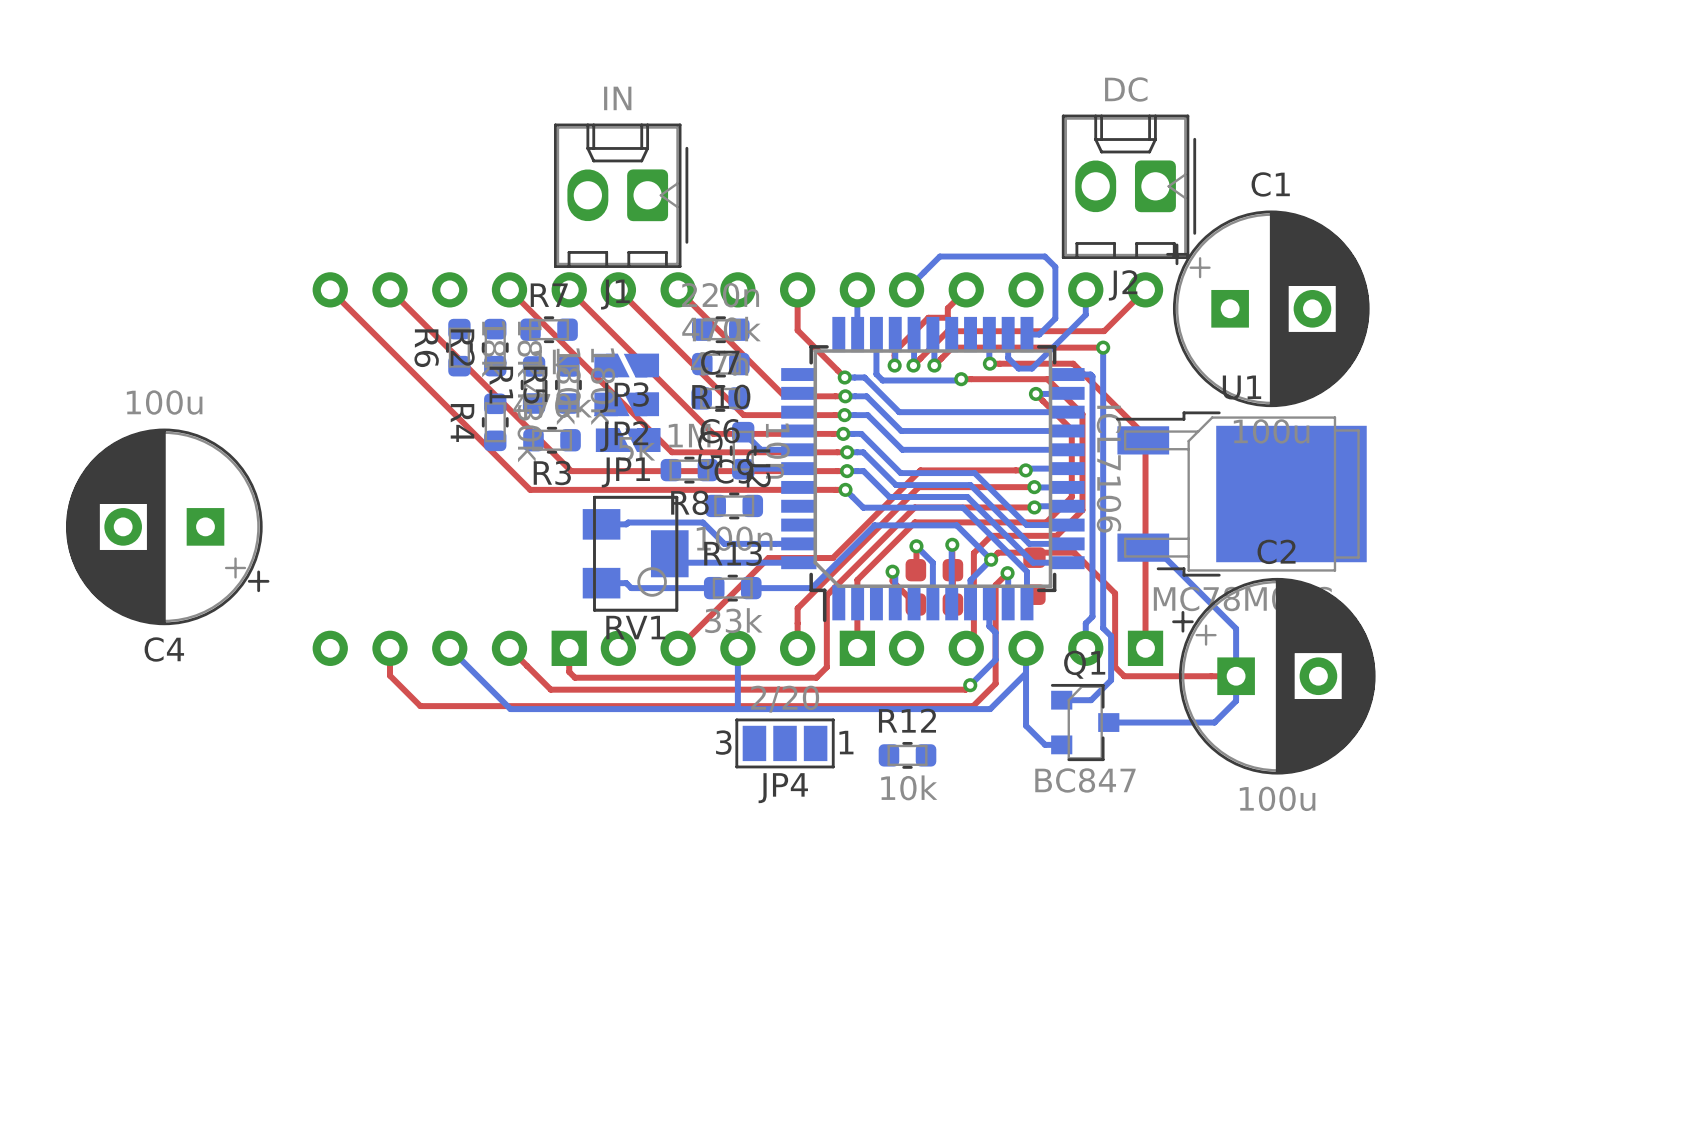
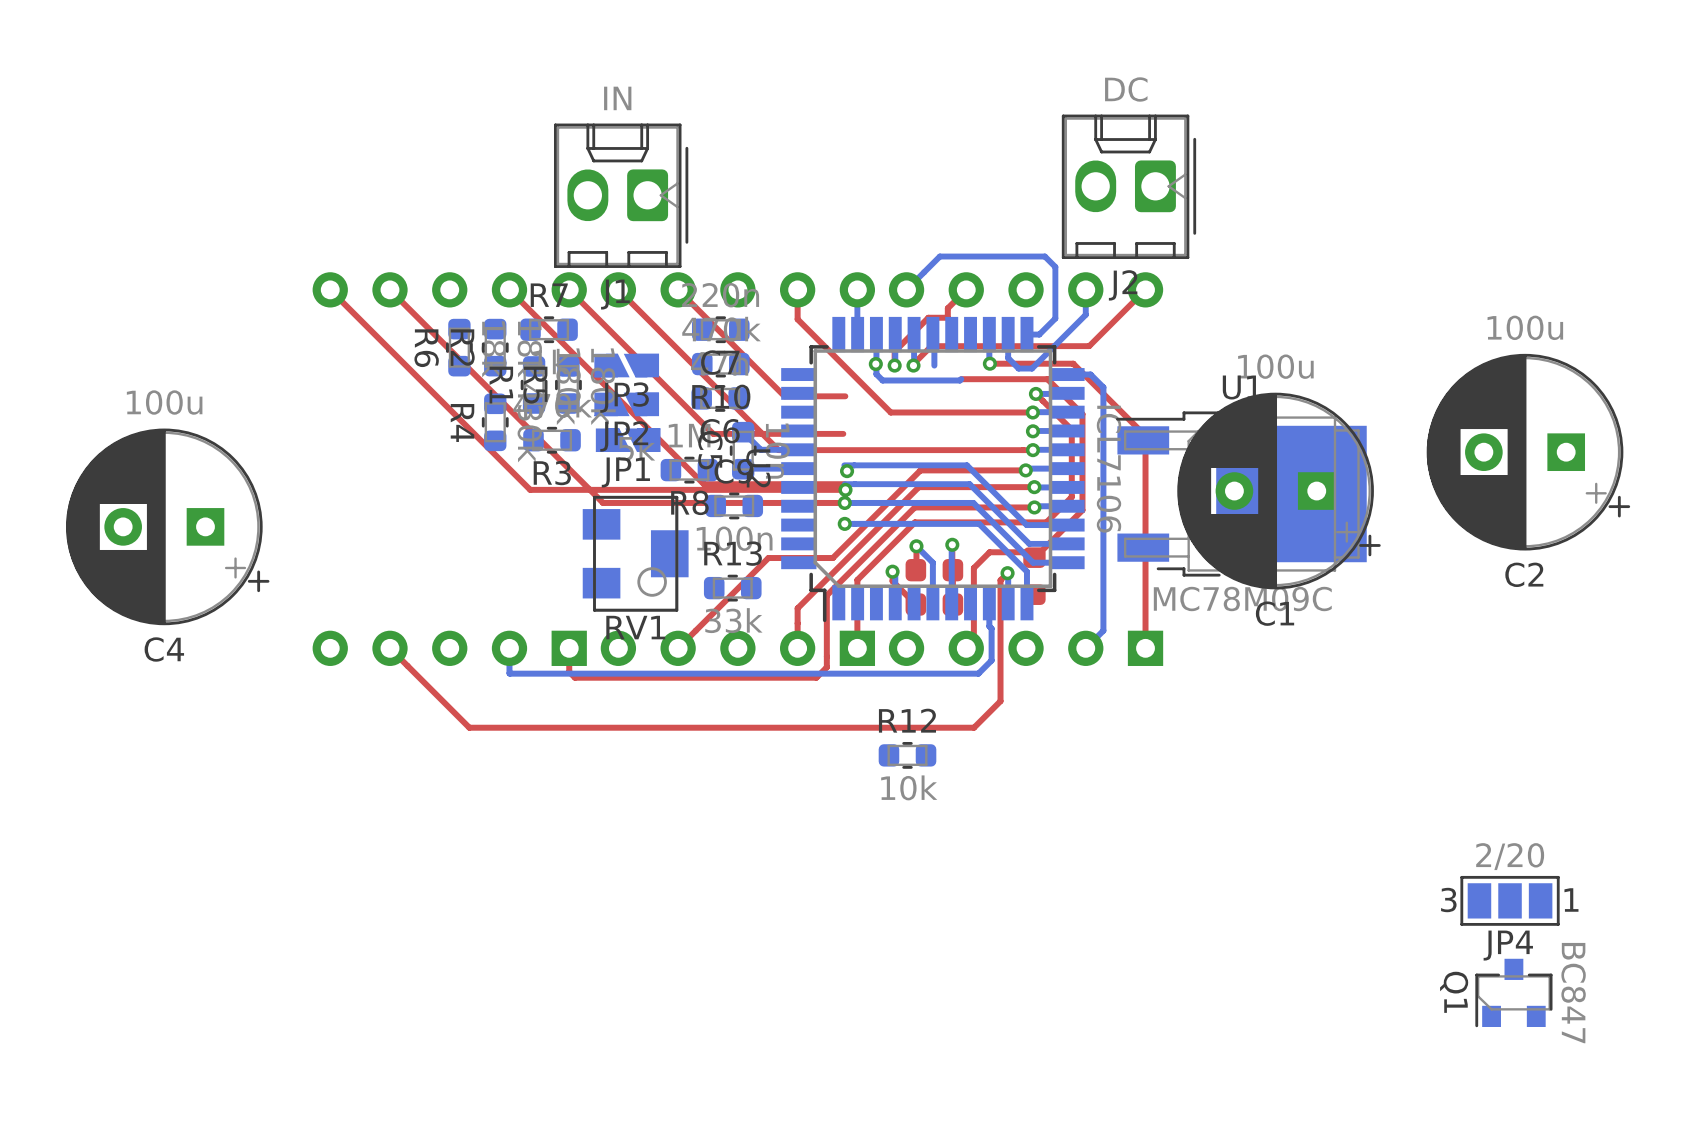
C1 rotation: 0° (1267, 308) -> 180° (1279, 491)
C1 position: (1267, 308) -> (1279, 491)
top track: (797, 319) (797, 330) (844, 377) -> (797, 319) (890, 412) (1032, 412)
top track: (1104, 331) (947, 331) (913, 365) -> (1104, 331) (1089, 346) (931, 346) (913, 364)
bottom track: (1103, 347) (1103, 628) (1111, 636) (1111, 680) (1091, 700) (1061, 700) -> none
top track: (1103, 347) (952, 347) (934, 365) -> none
via: (1103, 347) -> none
via: none -> (875, 364)
via: (934, 365) -> none
bottom track: (1092, 376) (1092, 616) (1085, 623) (1085, 648) -> (1092, 376) (1103, 387) (1103, 630) (1085, 648)
bottom track: (844, 377) (864, 377) (899, 412) (1033, 412) -> none
via: (844, 377) -> none
via: (961, 379) -> none
bottom track: (845, 396) (866, 396) (901, 430) (1033, 430) -> none
via: (845, 396) -> none
via: none -> (1032, 412)
bottom track: (844, 415) (867, 415) (902, 449) (1033, 449) -> none
top track: (844, 415) (743, 415) -> (1032, 450) (778, 450) (743, 415)
via: (844, 415) -> none
via: none -> (1032, 431)
bottom track: (843, 433) (861, 433) (900, 473) (974, 473) -> (844, 465) (966, 465) (974, 473)
via: (843, 433) -> none
via: none -> (1032, 450)
bottom track: (847, 452) (863, 452) (896, 485) (970, 485) -> (844, 484) (970, 485)
top track: (847, 452) (671, 452) -> (844, 484) (703, 484) (671, 452)
via: (847, 452) -> none
bottom track: (847, 471) (863, 471) (889, 497) (967, 497) (973, 502) -> (844, 502) (973, 502)
top track: (847, 471) (571, 471) -> (844, 502) (603, 502) (571, 471)
bottom track: (845, 489) (863, 507) (962, 507) (979, 523) -> (844, 523) (979, 523)
via: none -> (844, 502)
via: none -> (844, 523)
bottom track: (601, 524) (702, 522) (724, 543) (798, 543) -> none
top track: (1056, 535) (991, 535) (973, 553) (973, 568) -> (1056, 535) (1040, 552) (989, 552) (973, 568)
bottom track: (1143, 547) (1155, 547) (1236, 628) (1236, 701) (1214, 722) (1108, 722) -> none
bottom track: (669, 553) (678, 562) (798, 562) -> none
top track: (991, 559) (998, 552) (1074, 552) (1115, 593) (1115, 667) (1124, 676) (1236, 676) -> none
via: (991, 559) -> none
top track: (1000, 580) (995, 585) (995, 683) (973, 706) (420, 706) (390, 675) (390, 648) -> (1000, 580) (1000, 701) (974, 727) (469, 727) (390, 648)
bottom track: (601, 583) (626, 583) (631, 588) (713, 588) -> none
bottom track: (749, 588) (811, 588) (874, 525) (956, 525) (991, 559) (970, 580) (970, 602) -> none
bottom track: (991, 628) (995, 632) (995, 659) (970, 685) -> (991, 628) (991, 660) (978, 673) (509, 673) (509, 648)
bottom track: (449, 648) (510, 709) (990, 709) (1026, 673) -> none
top track: (509, 648) (550, 689) (965, 689) (970, 685) -> none
bottom track: (737, 648) (737, 709) -> none
bottom track: (1026, 648) (1026, 725) (1045, 744) (1061, 744) -> none
C2 rotation: 0° (1273, 676) -> 180° (1528, 452)
C2 position: (1273, 676) -> (1528, 452)
via: (970, 685) -> none
Q1 rotation: 0° (1085, 722) -> 90° counterclockwise (1513, 993)
Q1 position: (1085, 722) -> (1513, 993)
JP4 position: (785, 743) -> (1510, 900)

